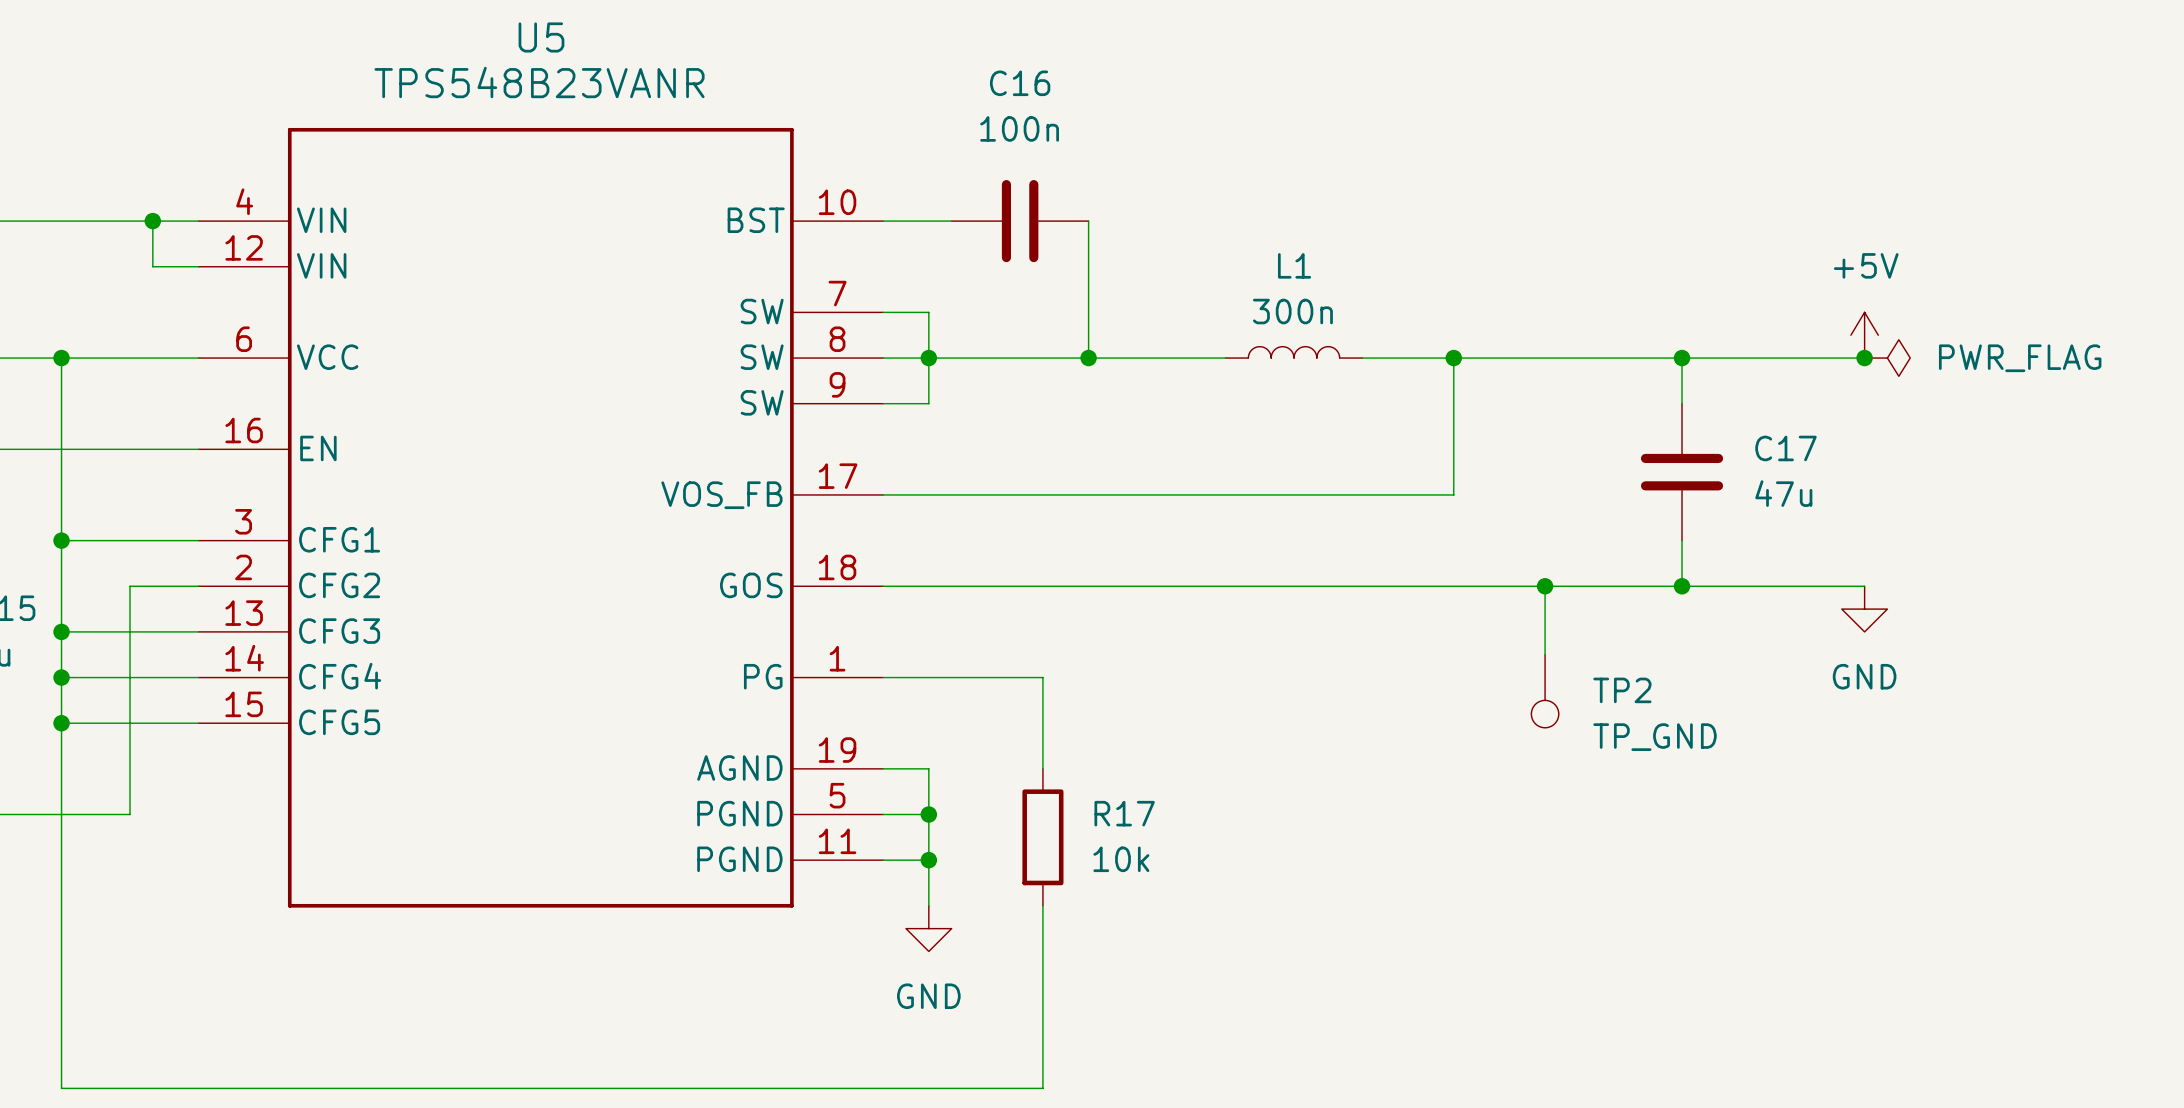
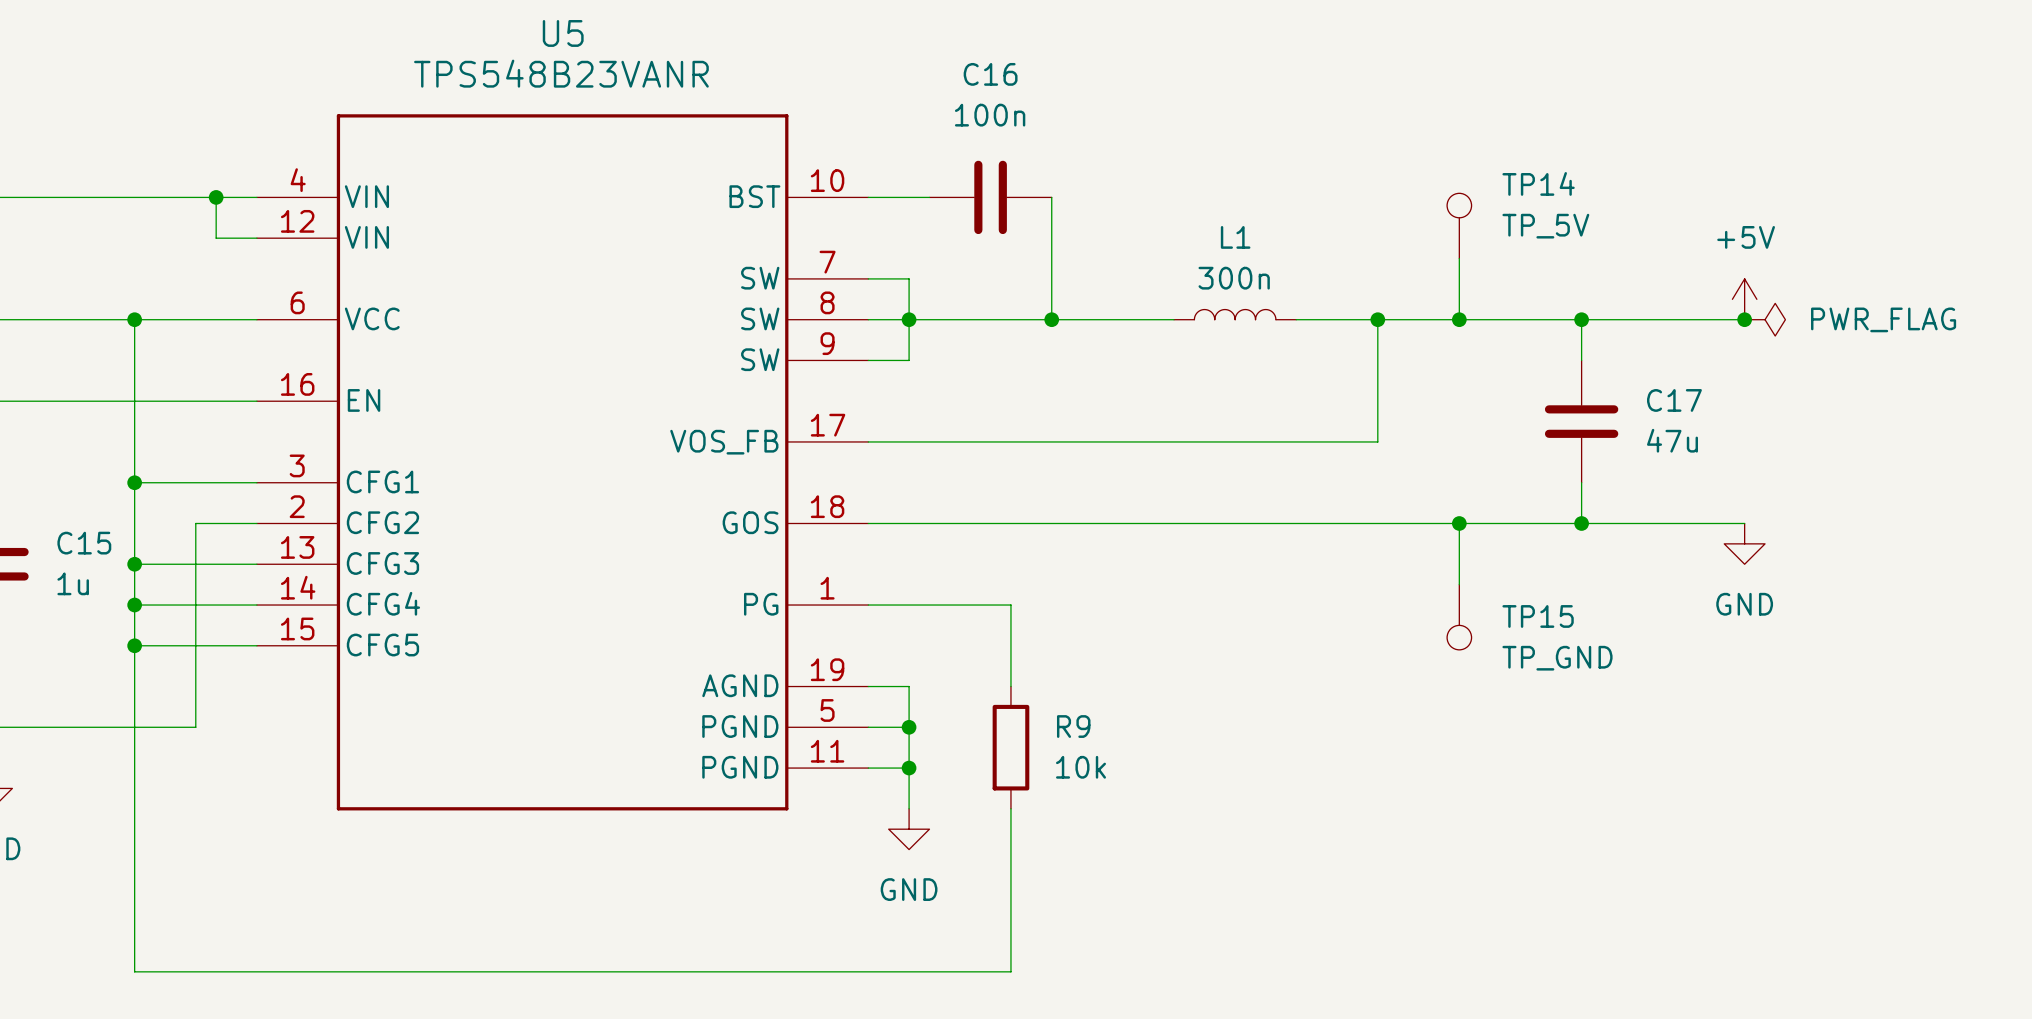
TP14: none -> TP_5V (1459, 225)
wire: none -> (1459, 258) (1459, 319)
junction: none -> (1459, 319)
TP2 name: TP2 (1622, 690) -> TP15 (1538, 616)
R17 name: R17 (1124, 813) -> R9 (1073, 726)

